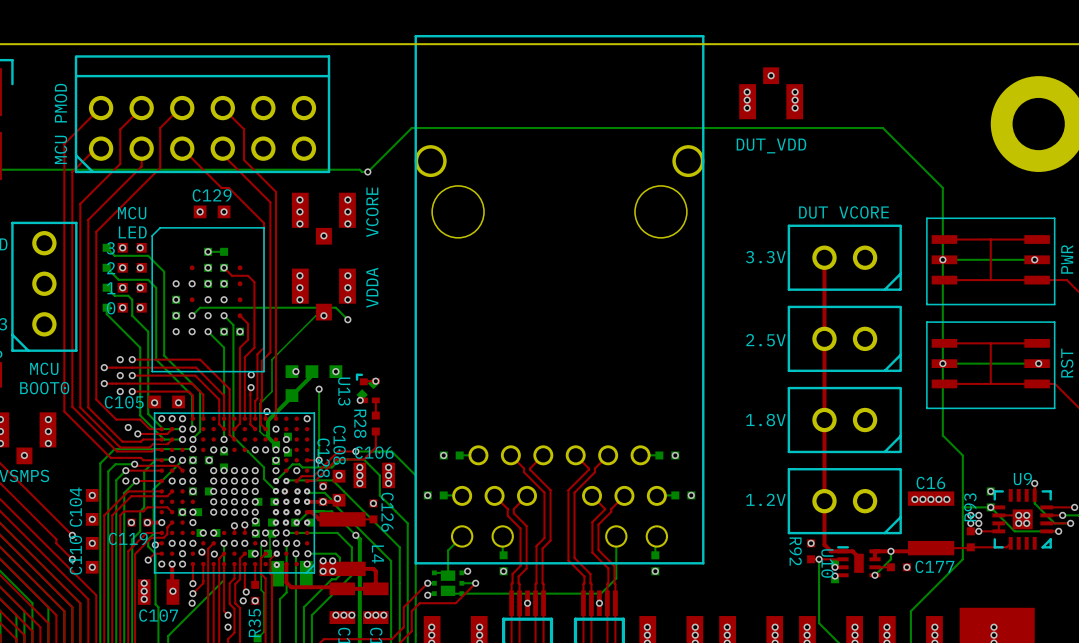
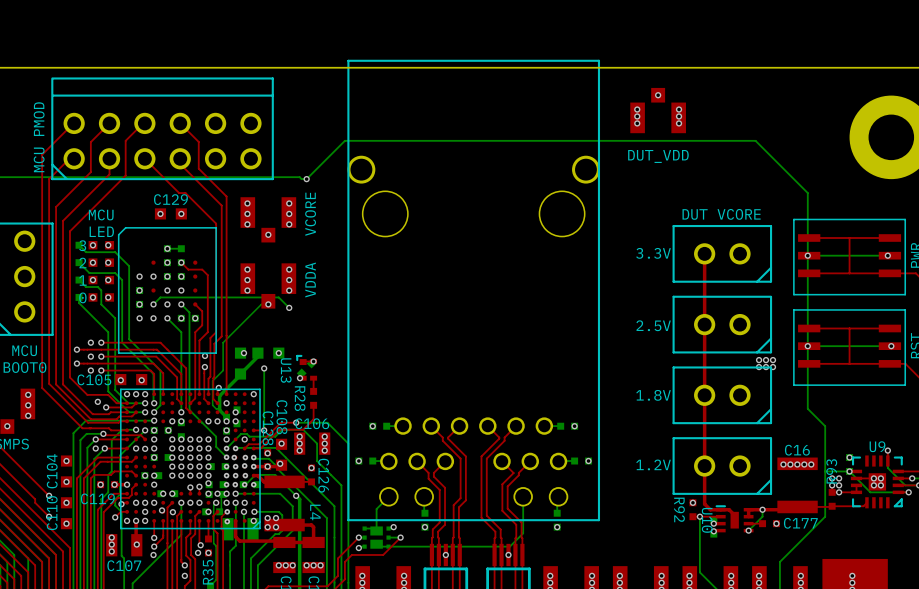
via: none -> (759, 360)
via: none -> (766, 360)
via: none -> (772, 360)
via: none -> (759, 367)
via: none -> (766, 367)
via: none -> (772, 367)

